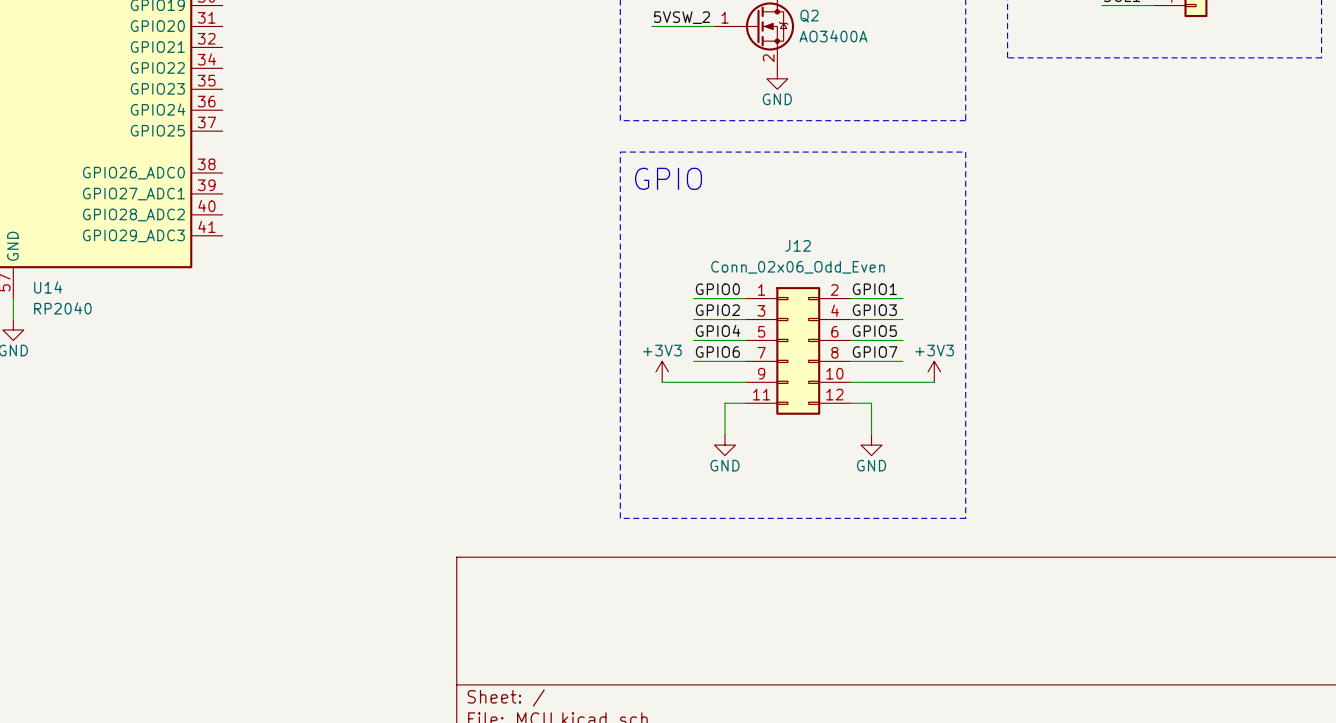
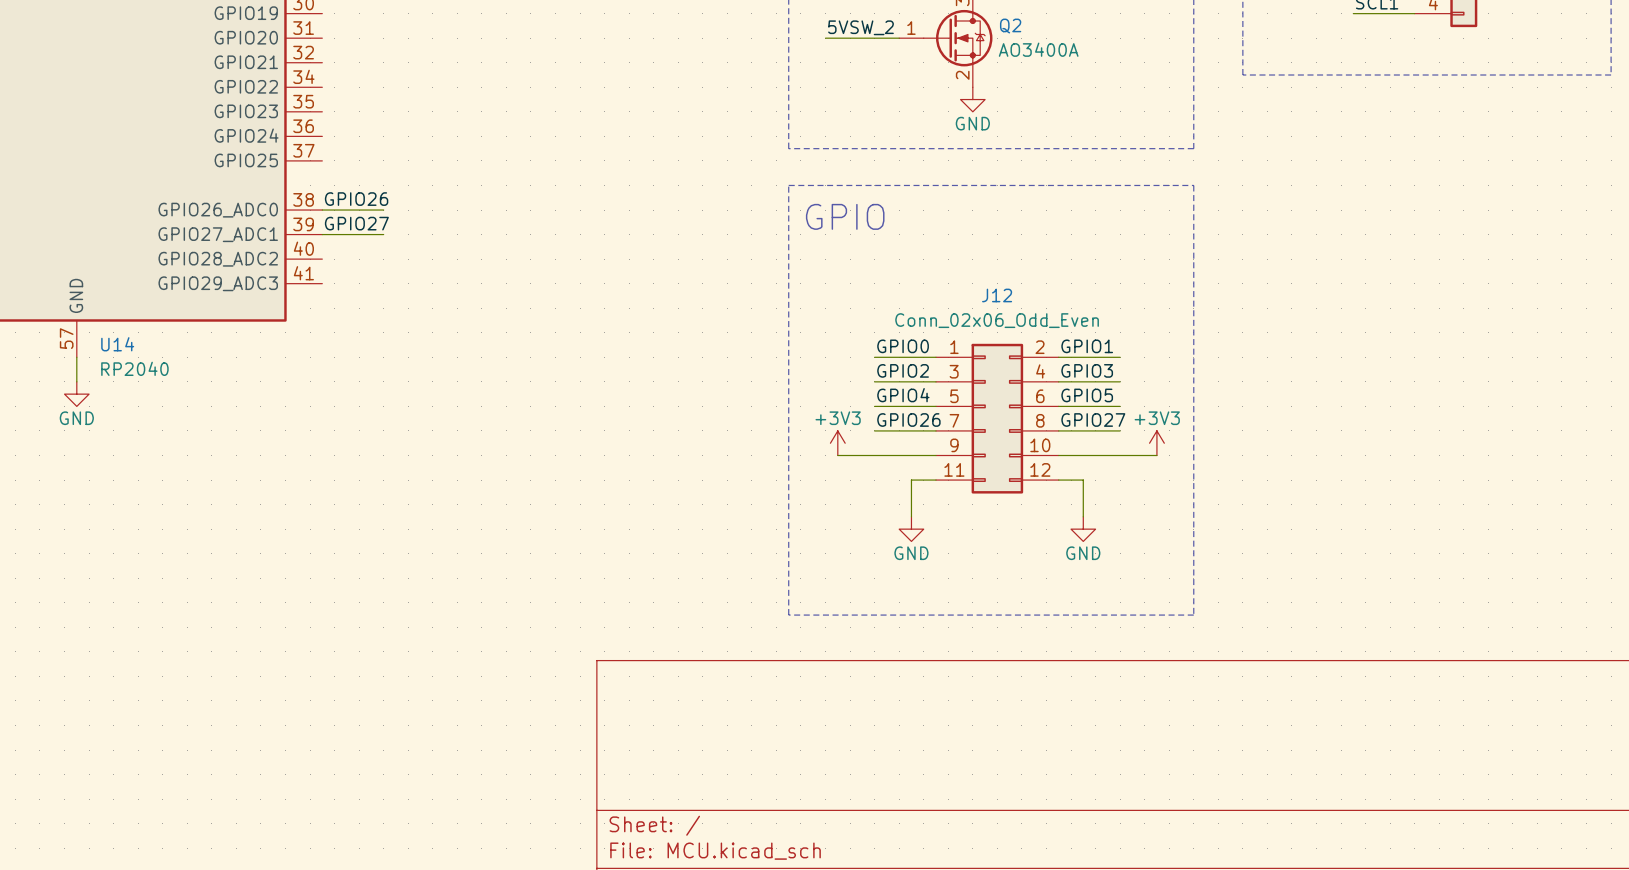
label: none -> GPIO26 (356, 199)
wire: none -> (322, 210) (383, 210)
label: none -> GPIO27 (356, 223)
wire: none -> (322, 234) (383, 234)
label: GPIO6 (717, 352) -> GPIO26 (908, 420)
label: GPIO7 (875, 352) -> GPIO27 (1093, 420)

